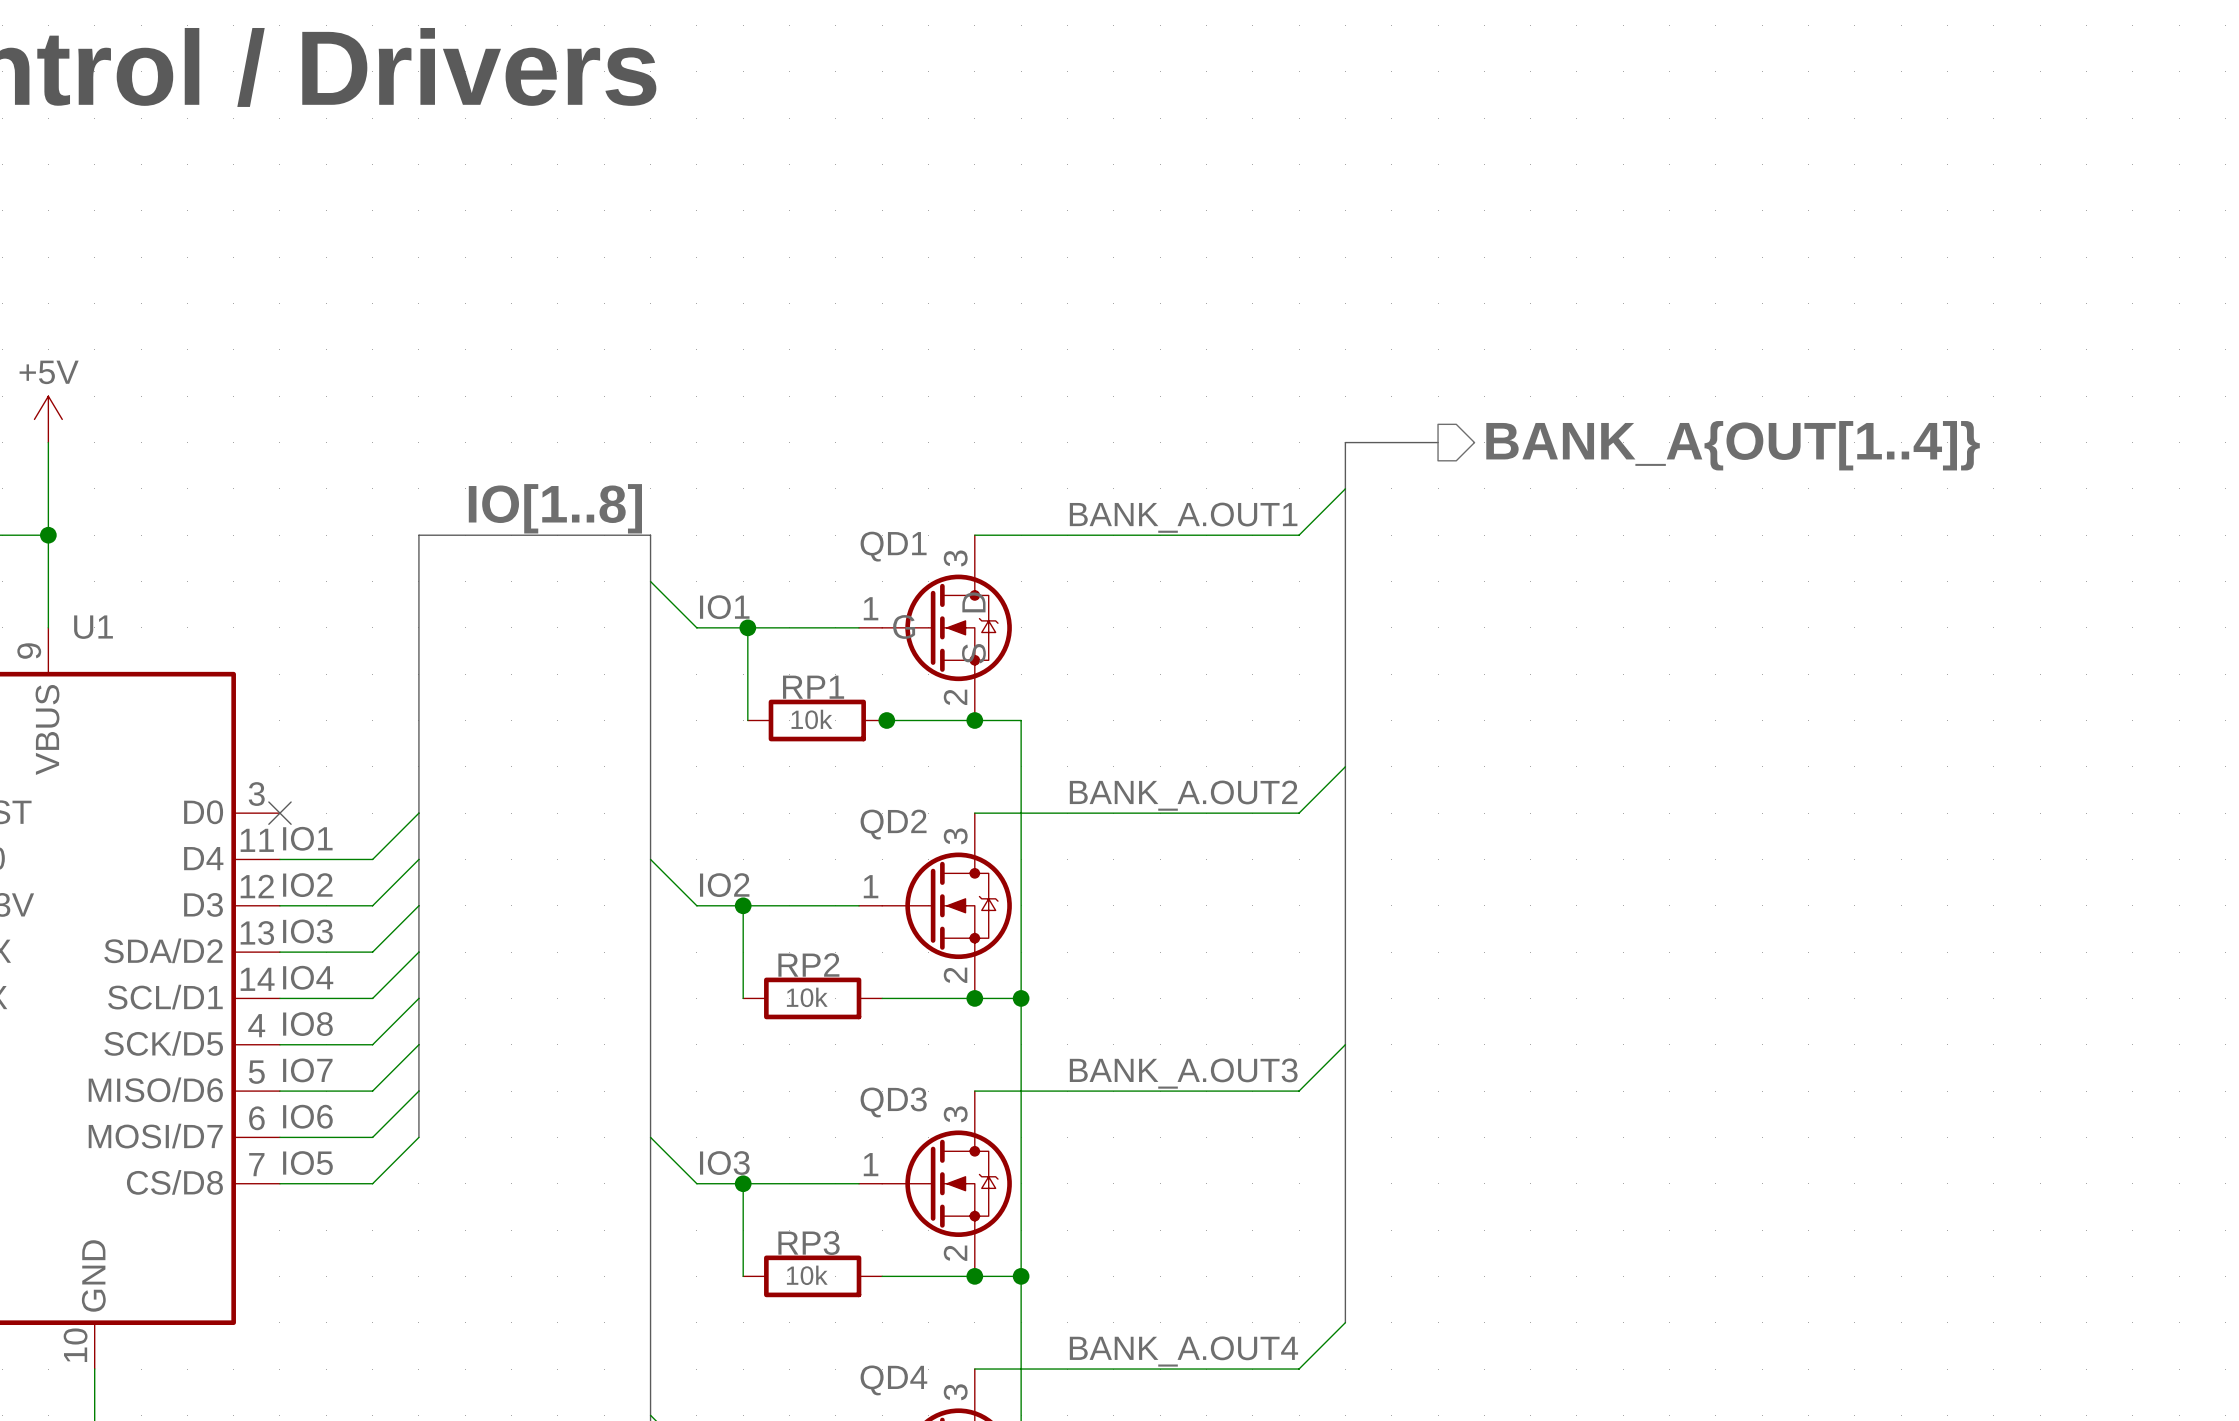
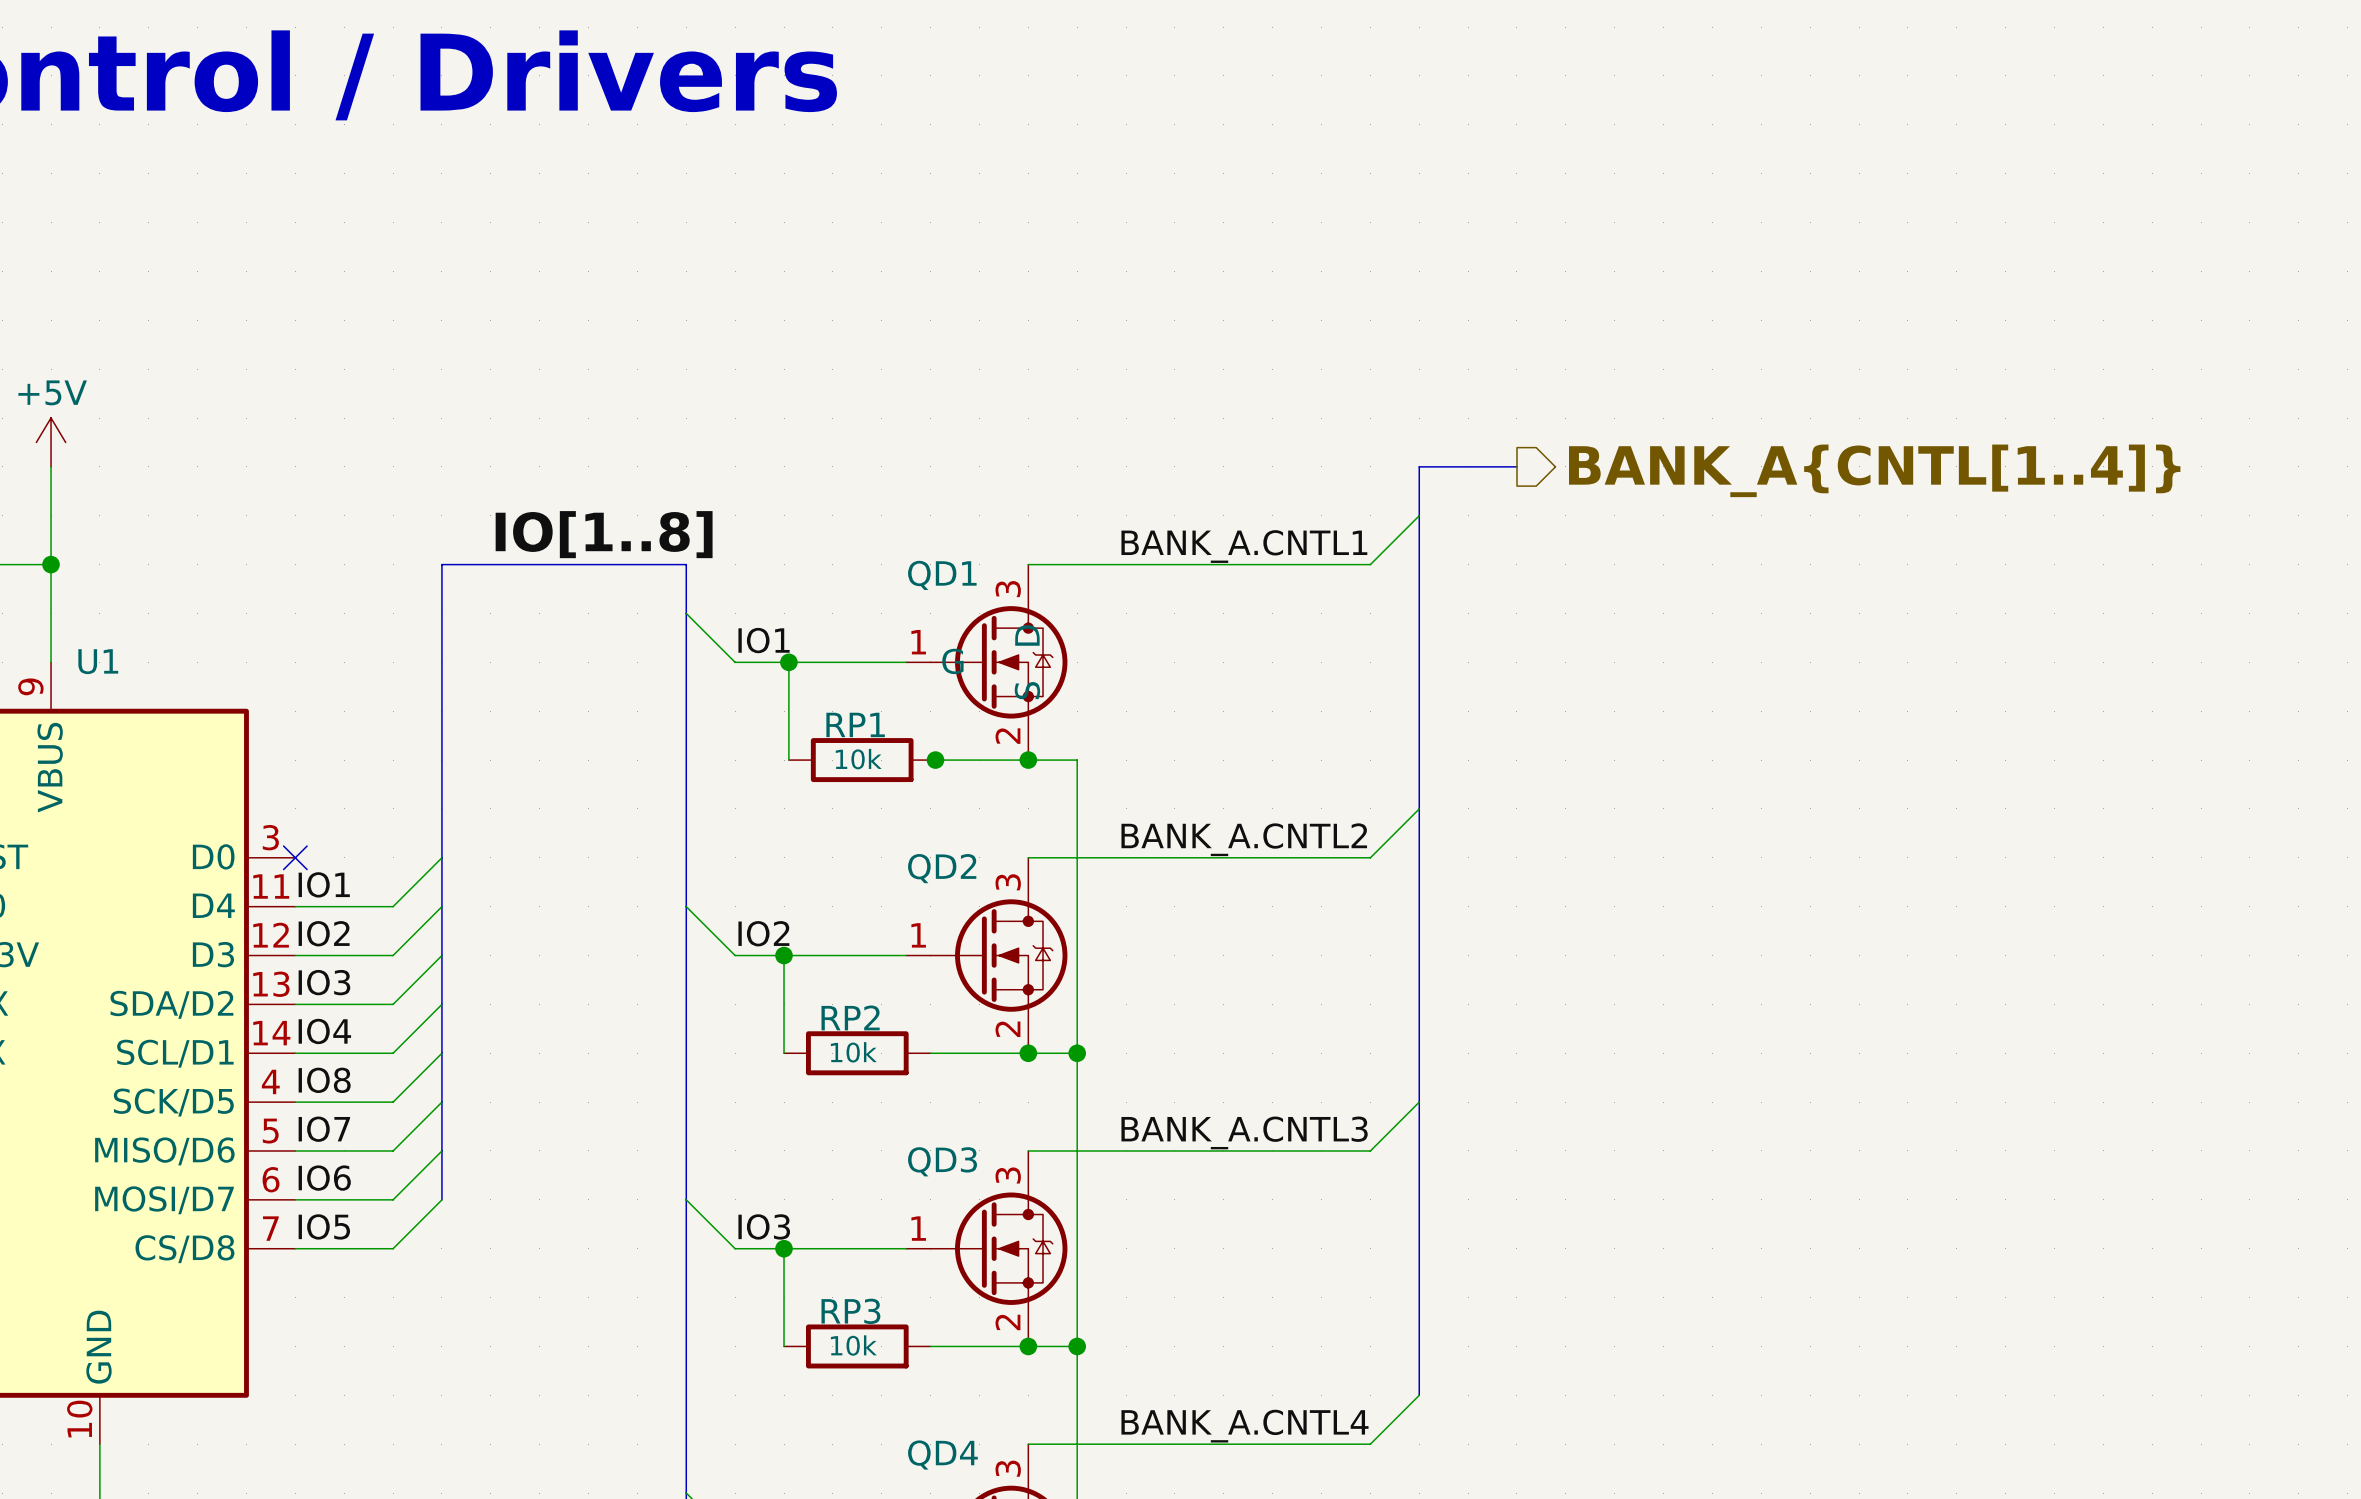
hierarchical label: BANK_A{OUT[1..4]} (1733, 445) -> BANK_A{CNTL[1..4]} (1874, 470)
label: BANK_A.OUT1 (1183, 517) -> BANK_A.CNTL1 (1244, 546)
label: BANK_A.OUT2 (1183, 795) -> BANK_A.CNTL2 (1244, 839)
label: BANK_A.OUT3 (1183, 1073) -> BANK_A.CNTL3 (1244, 1132)
label: BANK_A.OUT4 (1183, 1351) -> BANK_A.CNTL4 (1244, 1426)

